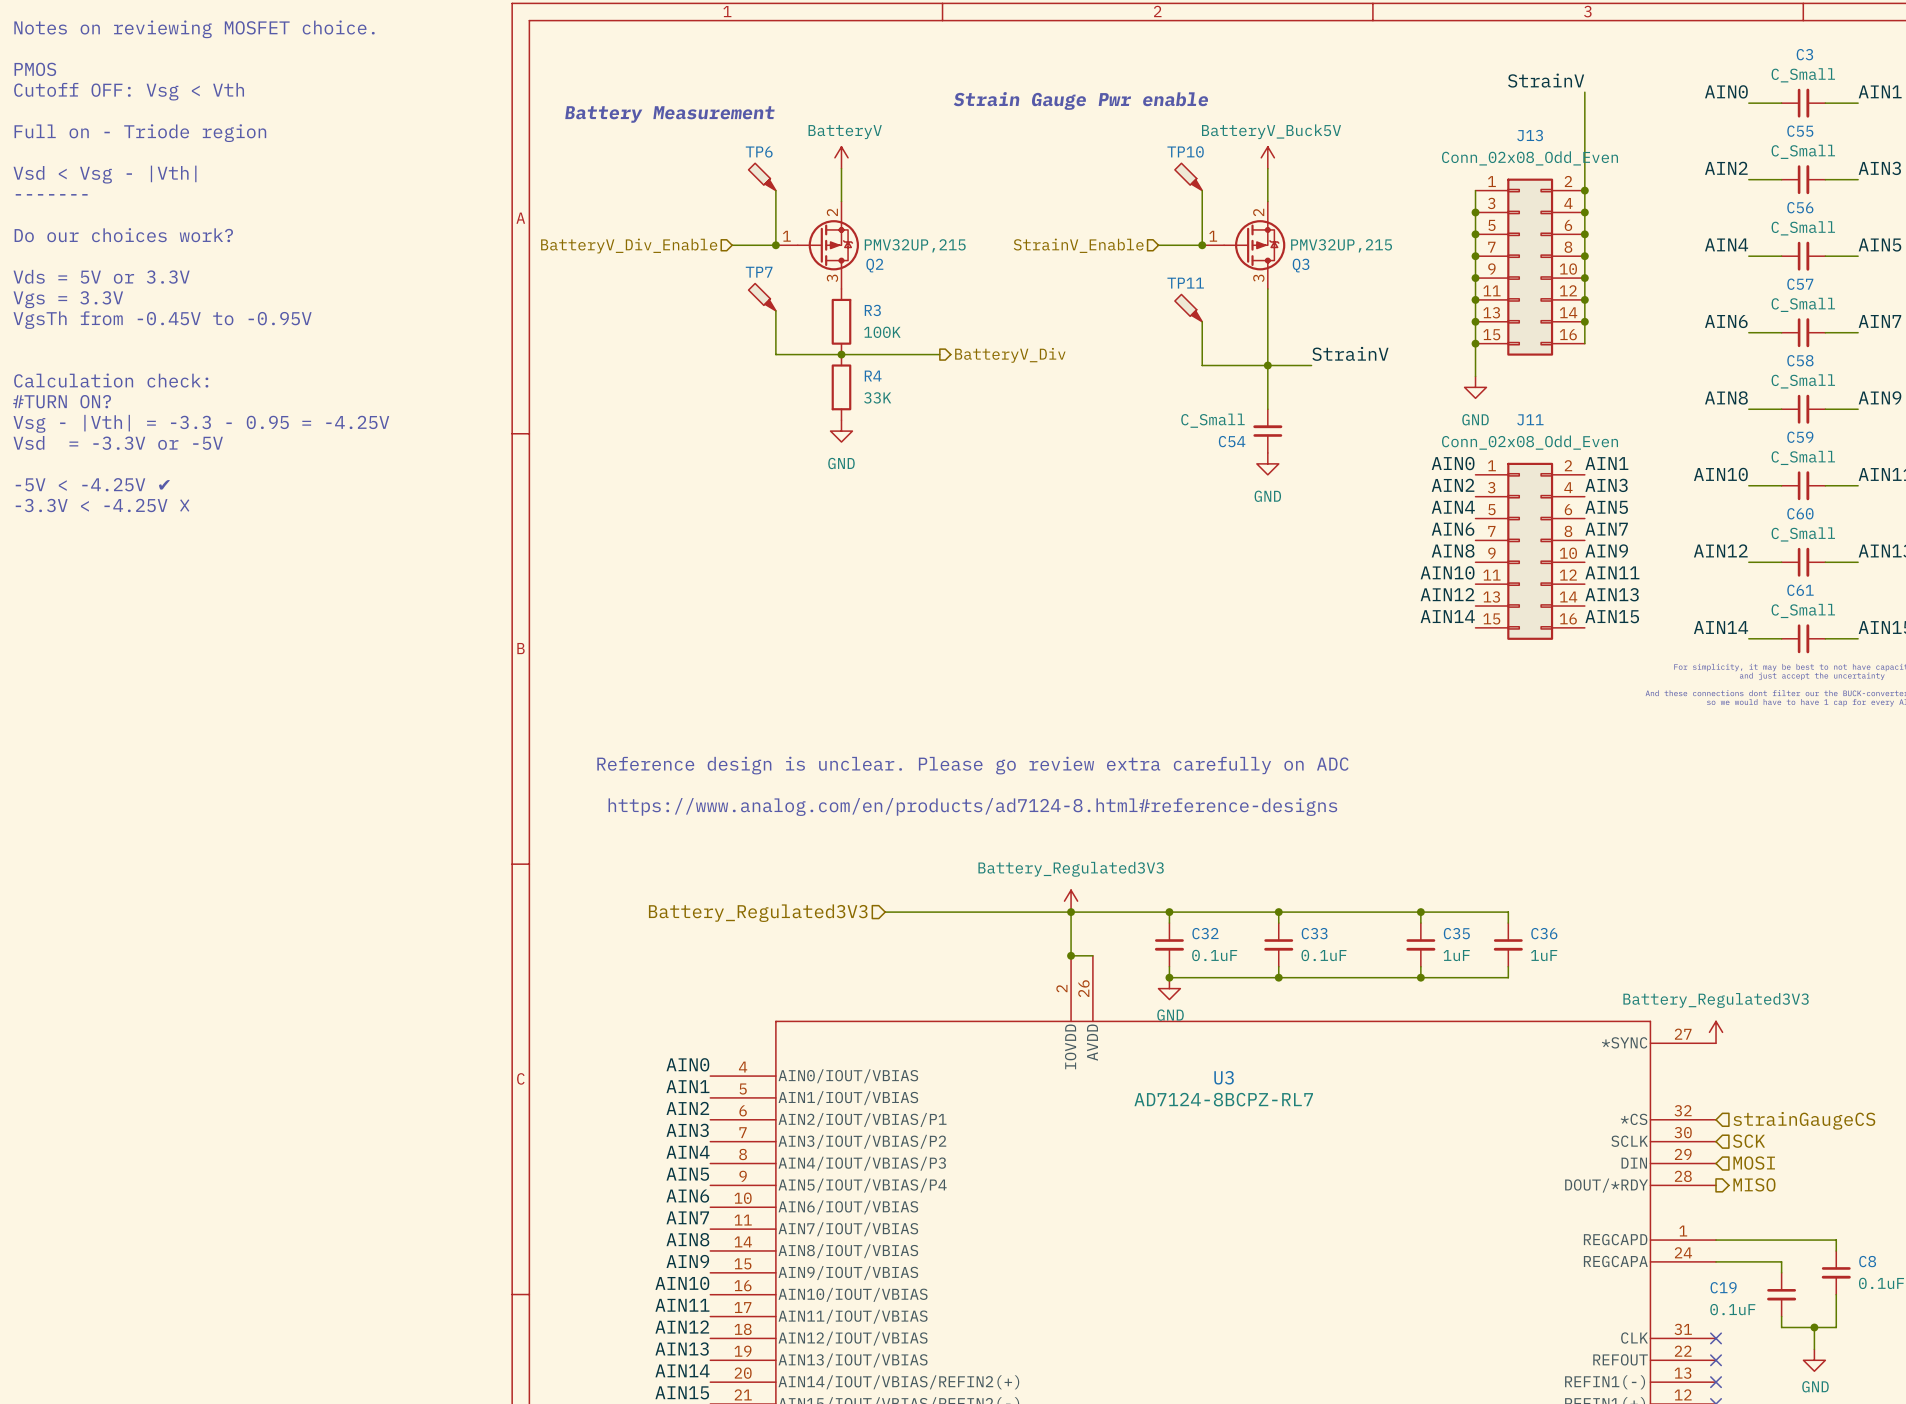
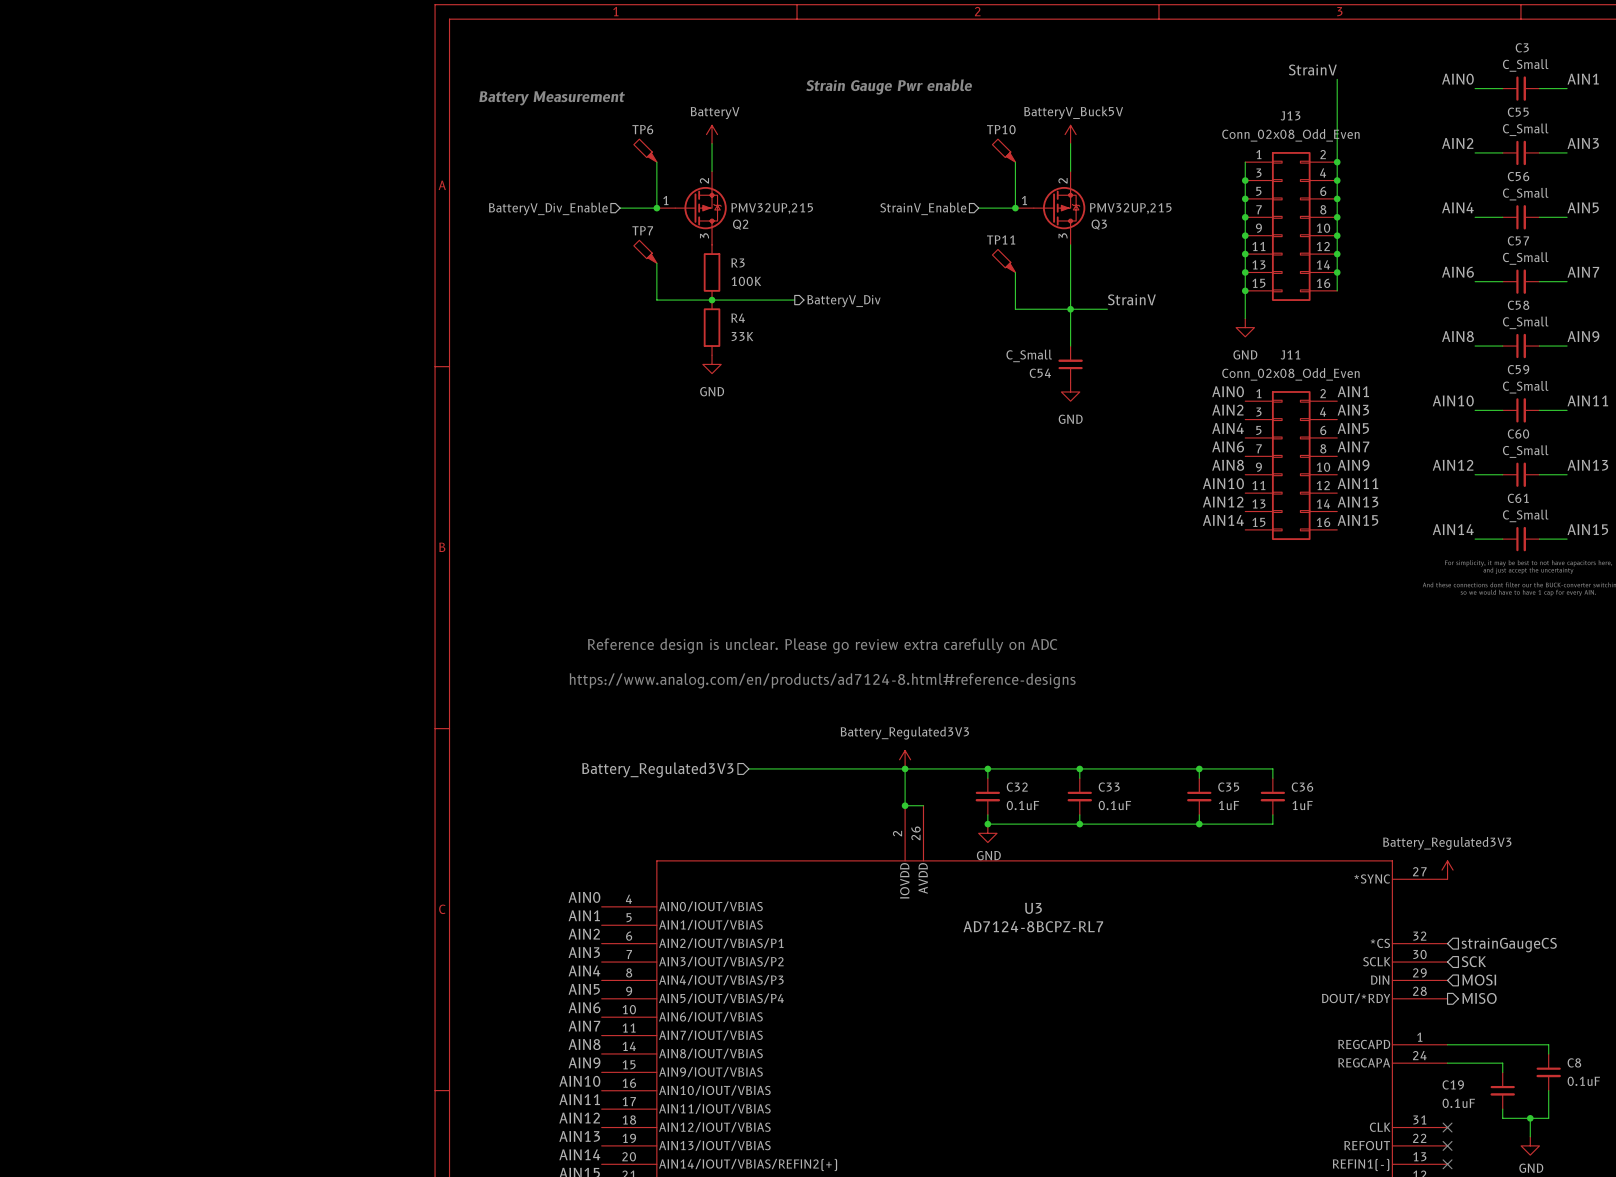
text: Notes on reviewing MOSFET choice. (194, 29) -> none
text: PMOS (35, 69) -> none
text: Cutoff OFF: Vsg < Vth (129, 91) -> none
text: Full on - Triode region (140, 133) -> none
text: Vsd < Vsg - |Vth| (105, 174) -> none
text: ------- (51, 194) -> none
text: Do our choices work? (123, 235) -> none
text: Vds = 5V or 3.3V (101, 276) -> none
text: Vgs = 3.3V (68, 299) -> none
text: VgsTh from -0.45V to -0.95V (162, 320) -> none
text: Calculation check: (111, 380) -> none
text: #TURN ON? (62, 401) -> none
text: Vsg - |Vth| = -3.3 - 0.95 = -4.25V (201, 423) -> none
text: Vsd = -3.3V or -5V (118, 442) -> none
text: -5V < -4.25V ✔ (92, 484) -> none
text: -3.3V < -4.25V ❌ (102, 505) -> none

